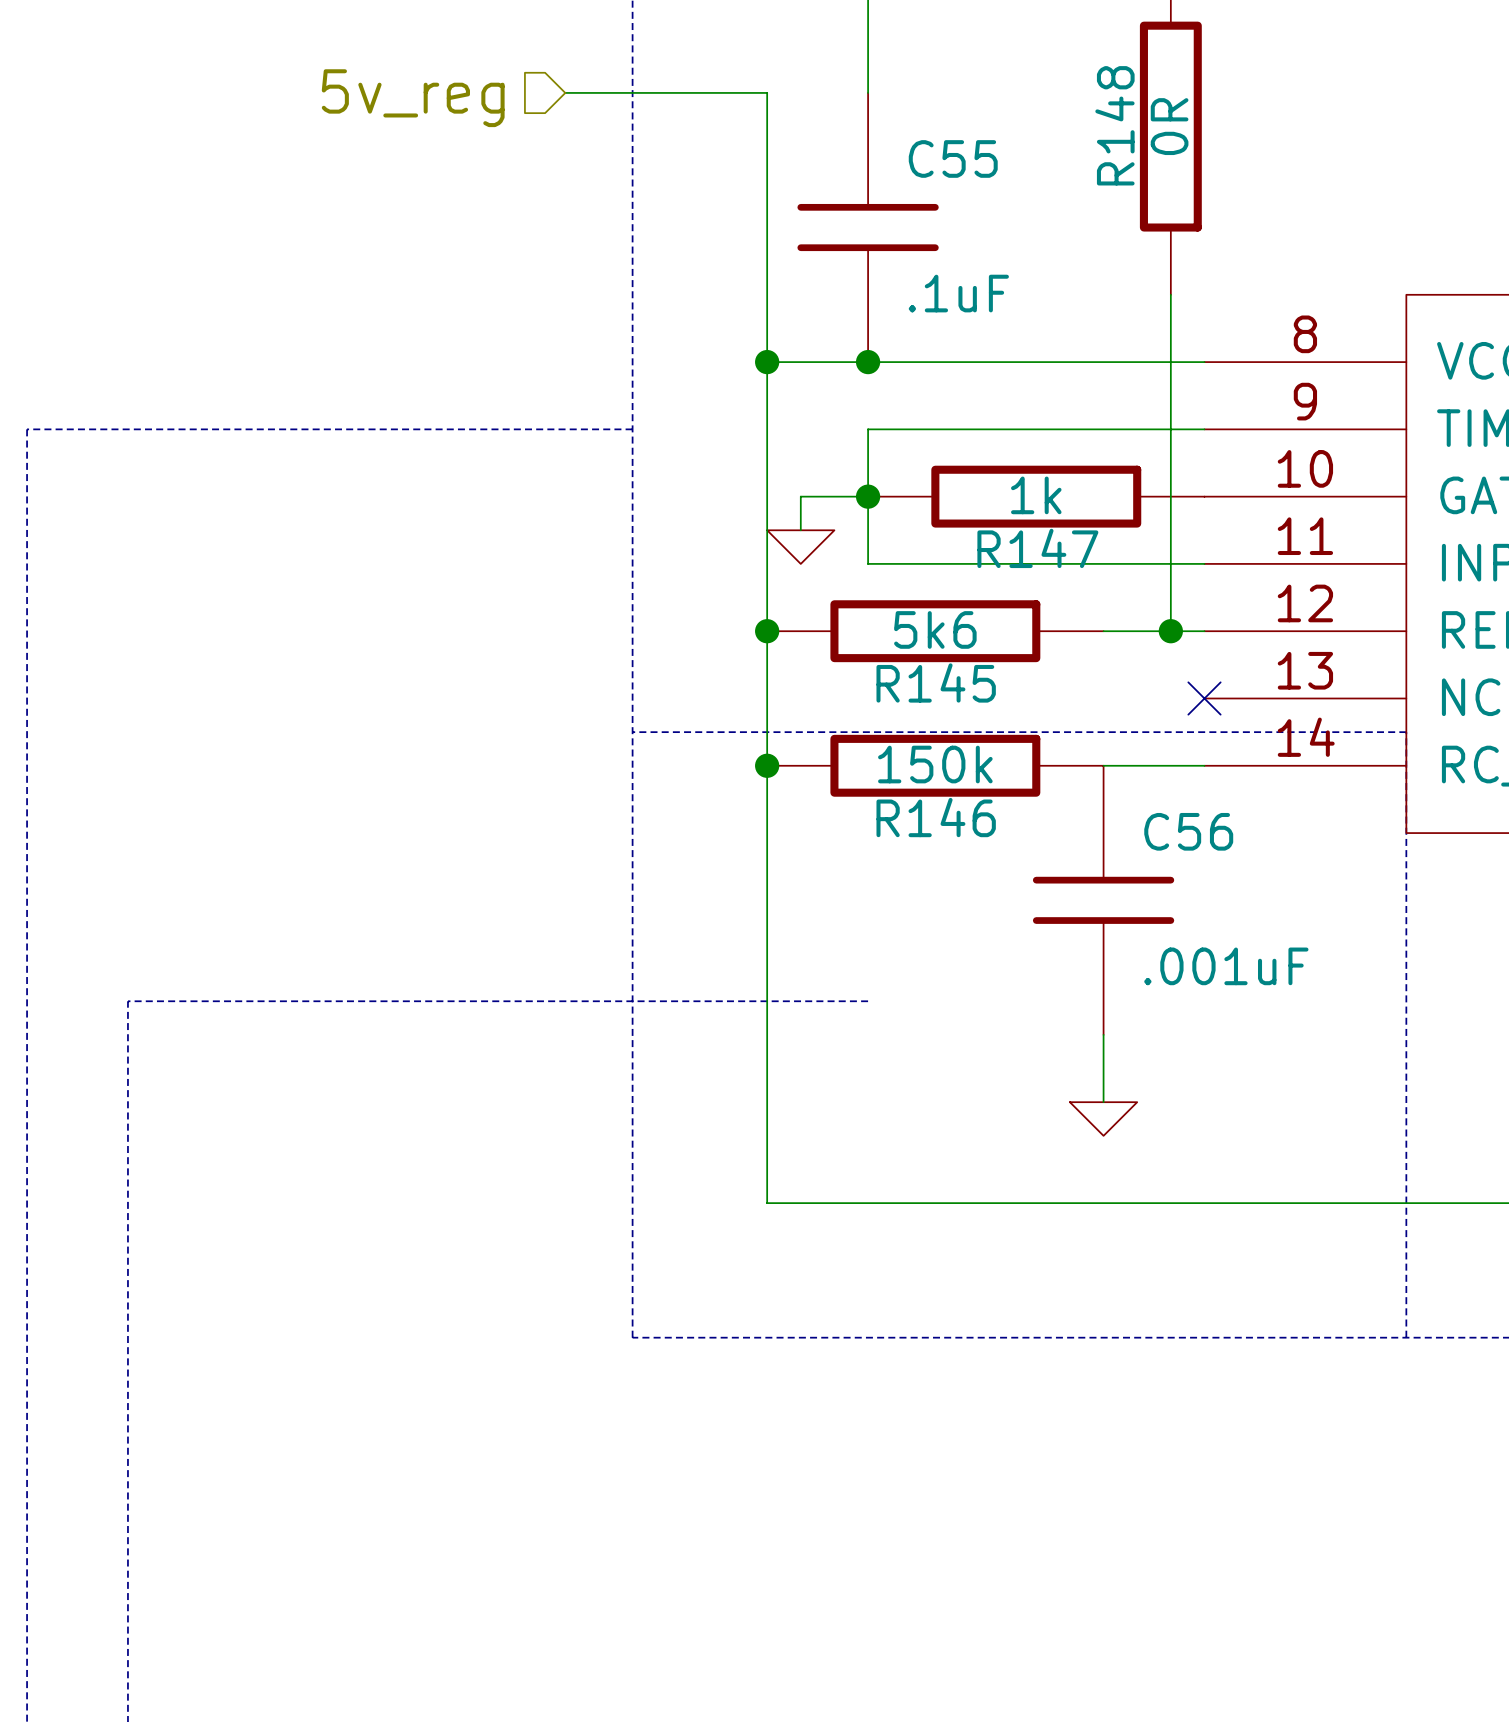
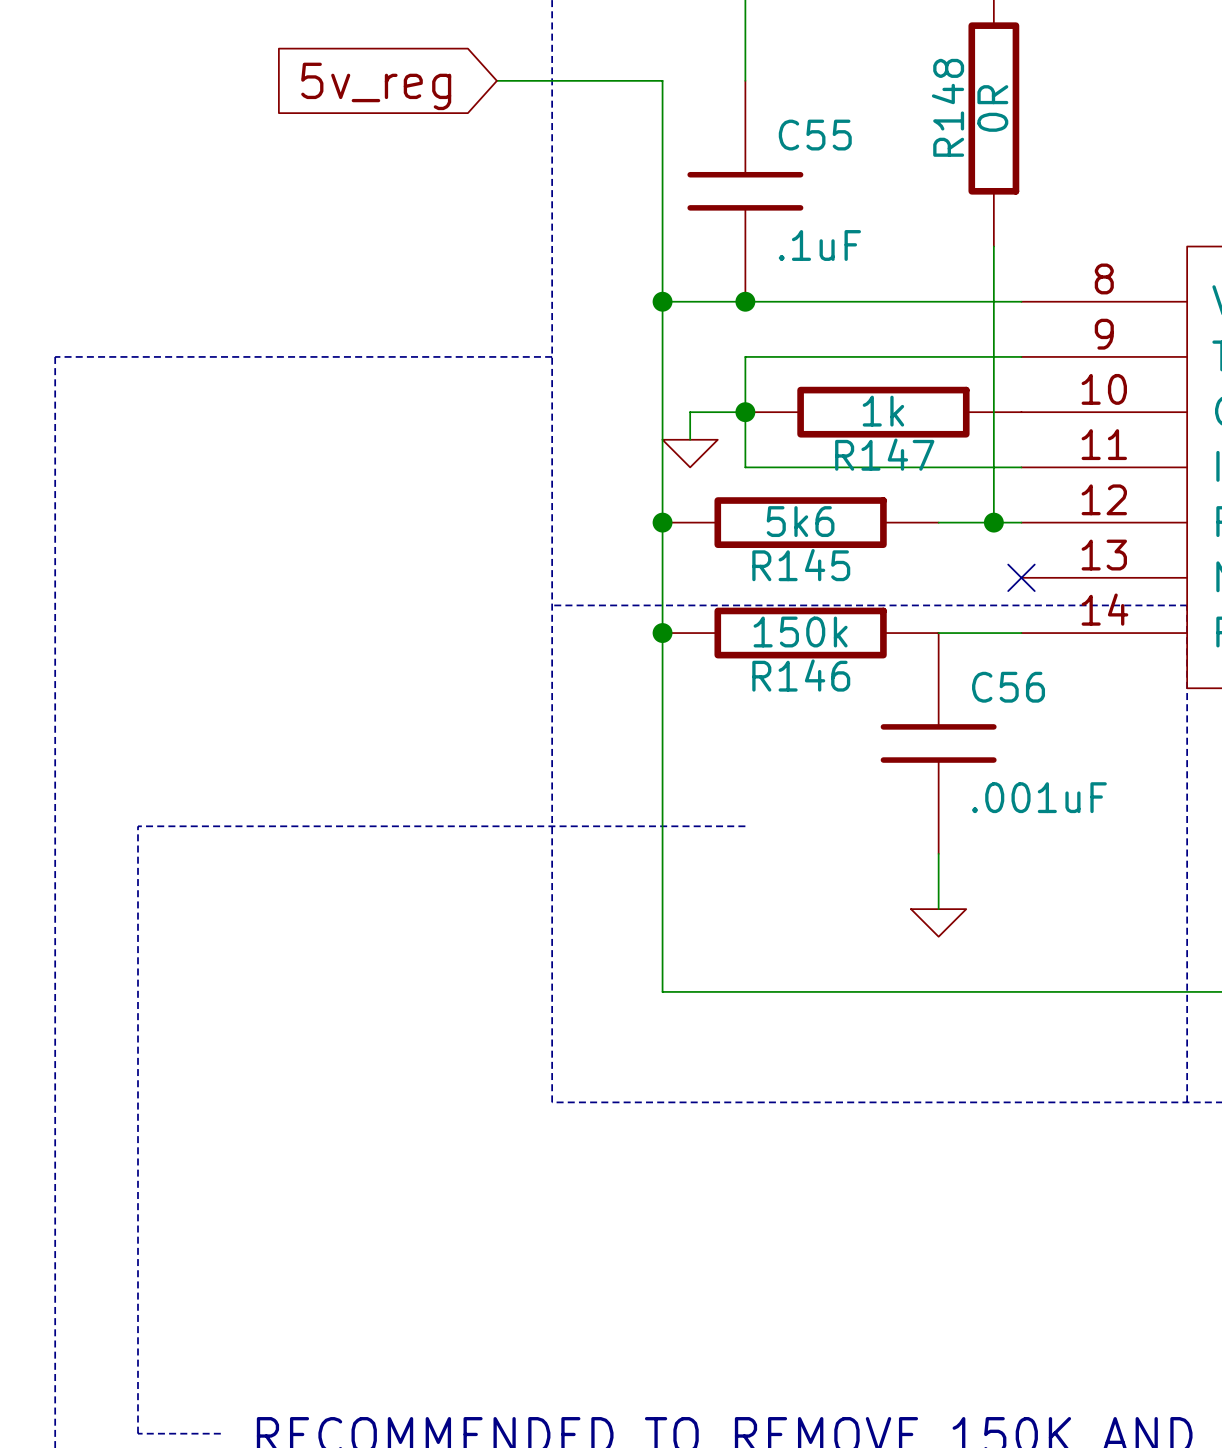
hierarchical label: 5v_reg (413, 98) -> none
global label: none -> 5v_reg (376, 86)

